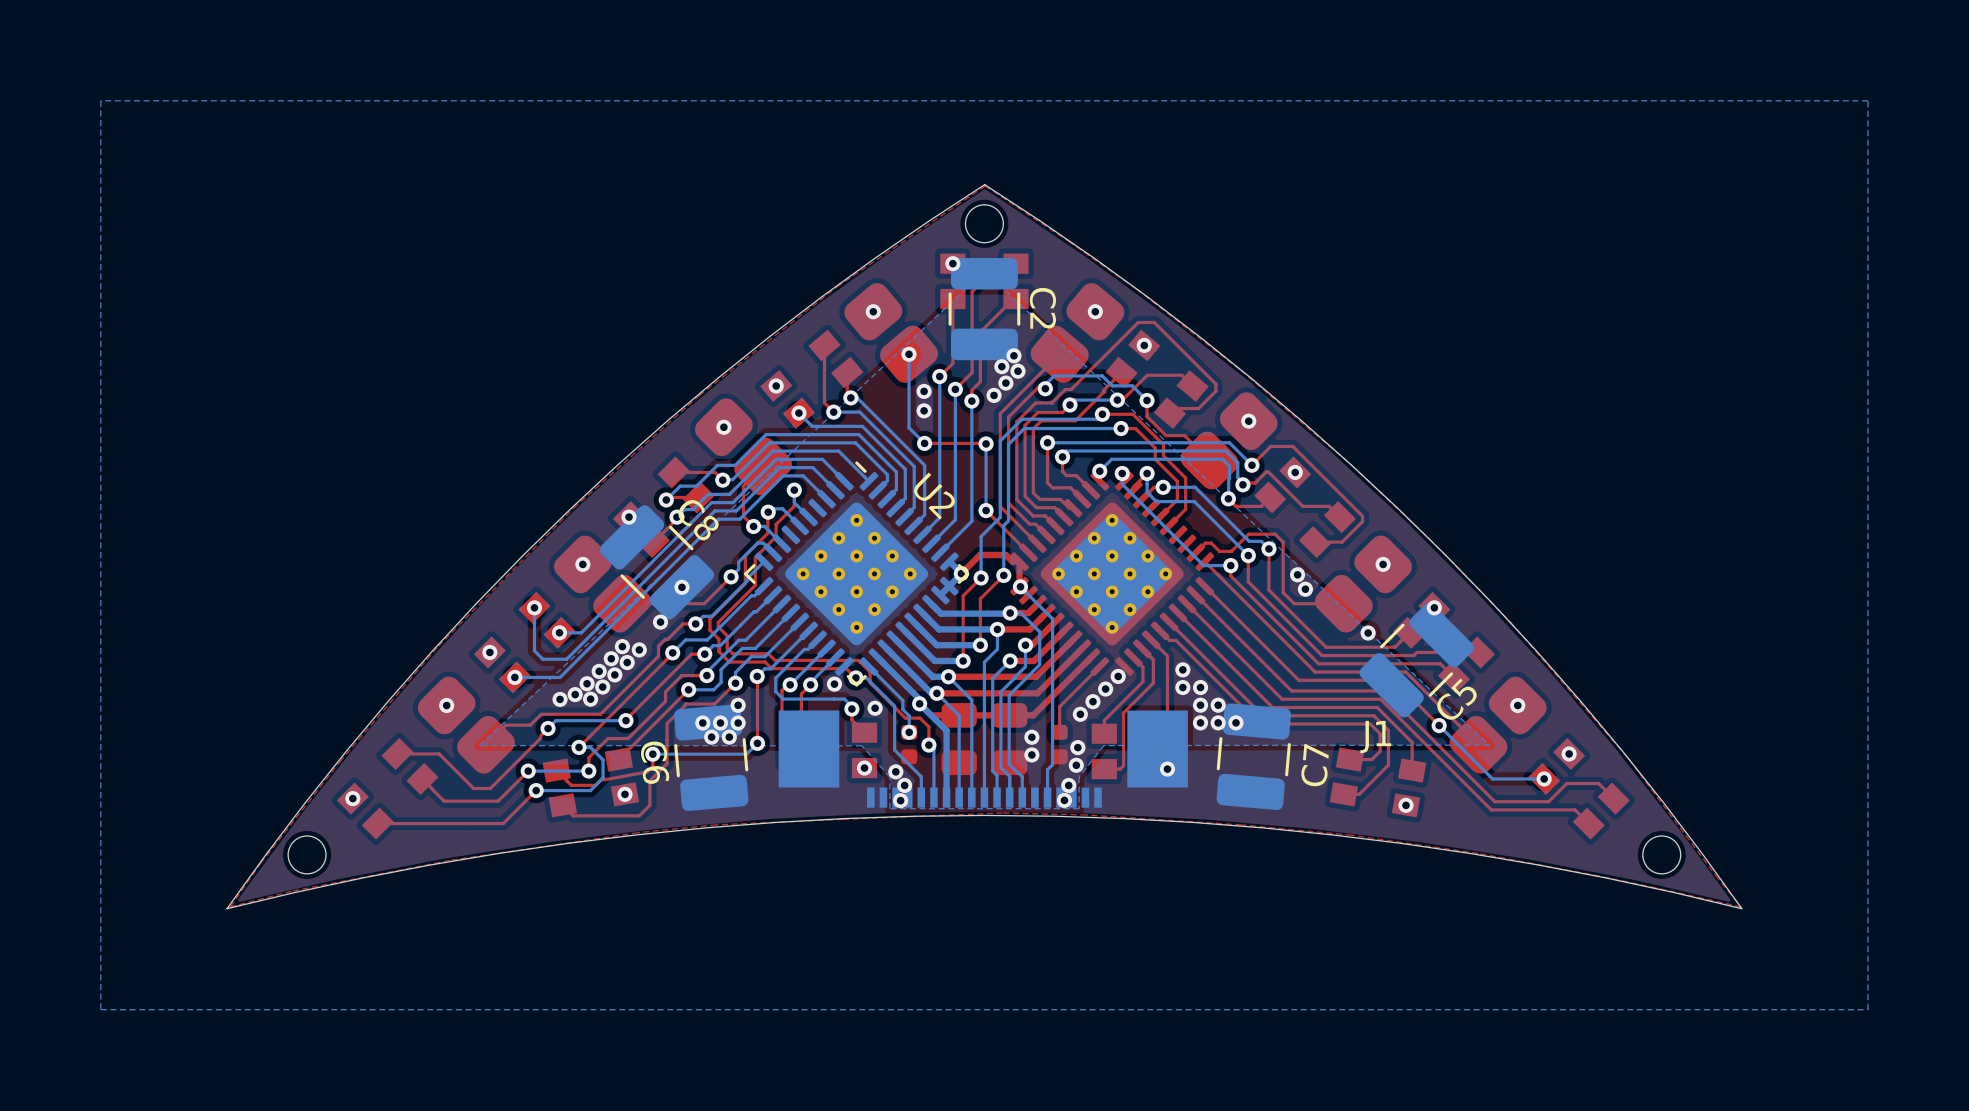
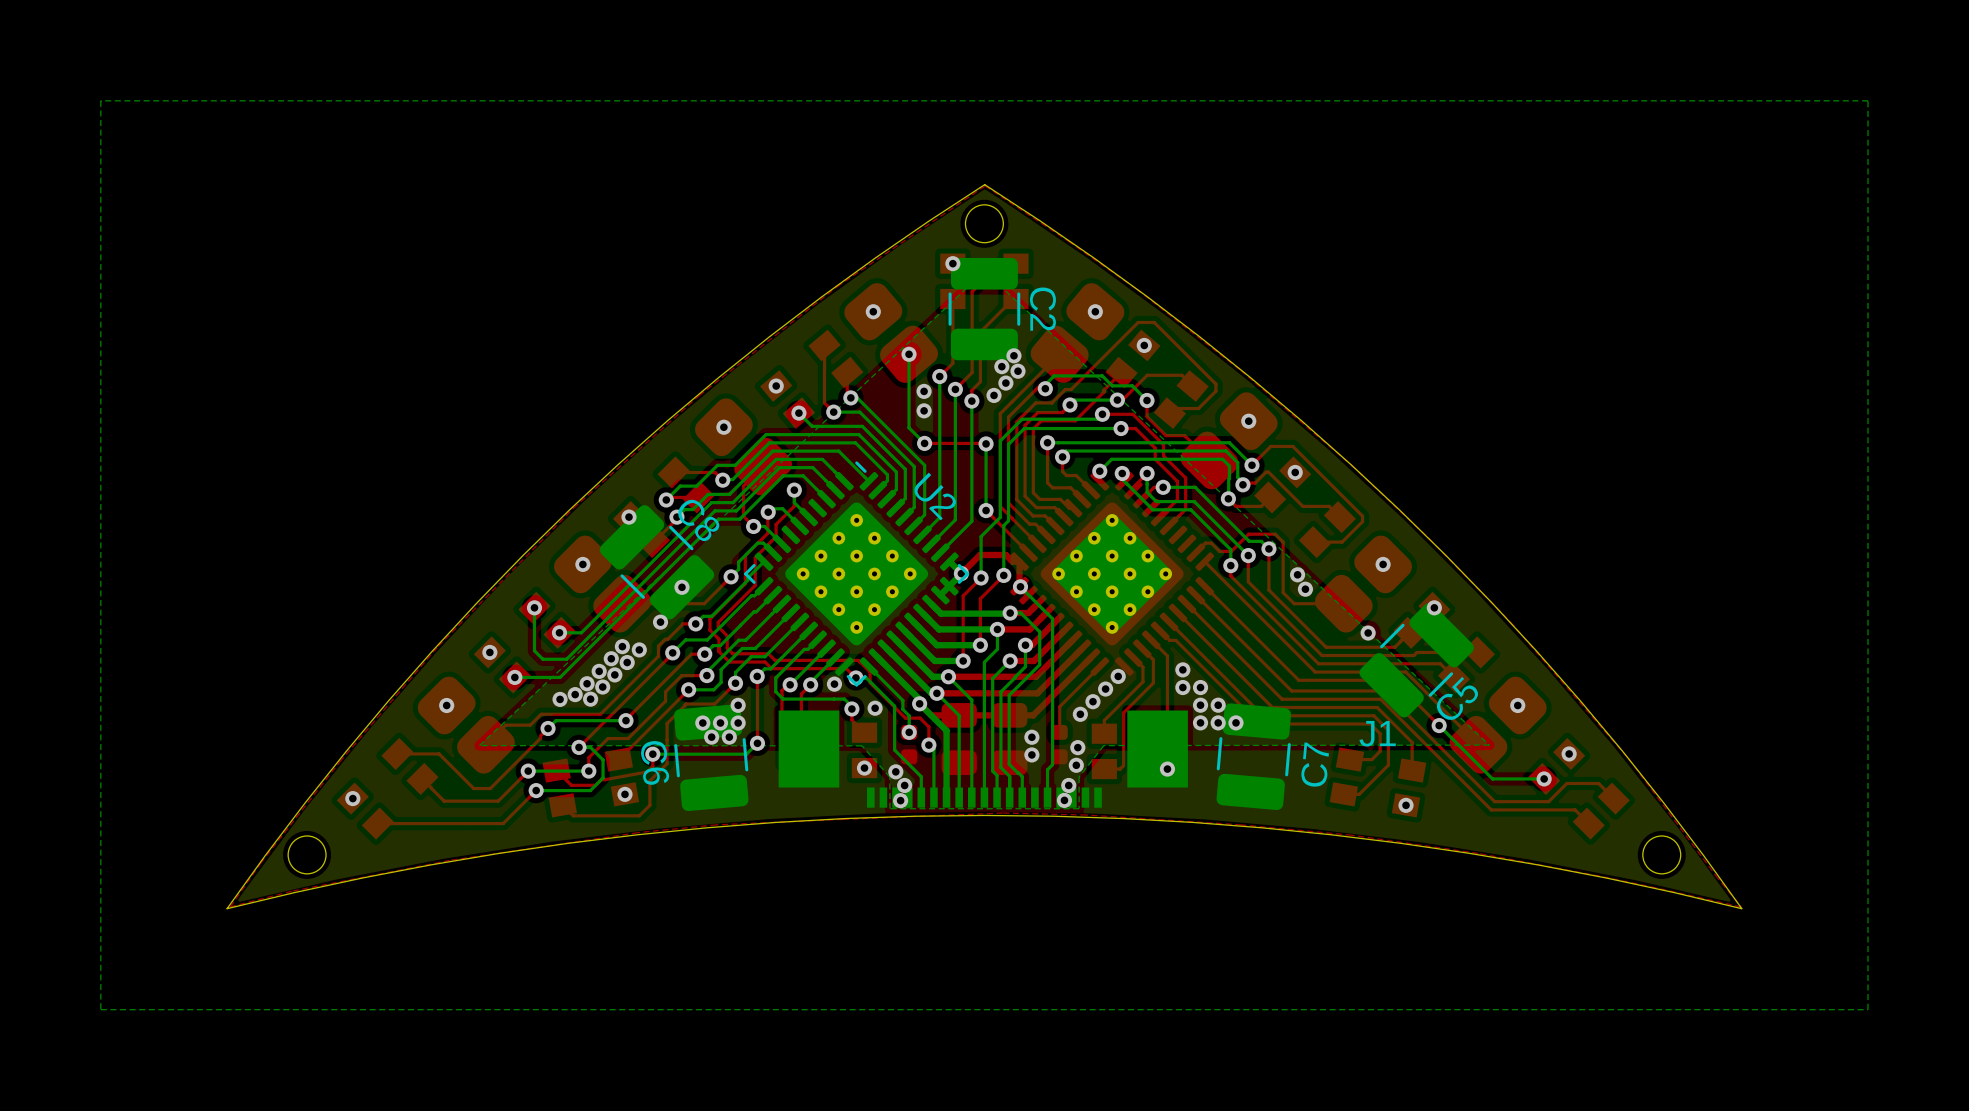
bottom track: (1122, 479) (1122, 484) (1203, 565) (1230, 565) -> (1122, 479) (1152, 509) (1190, 509) (1230, 549) (1230, 565)

